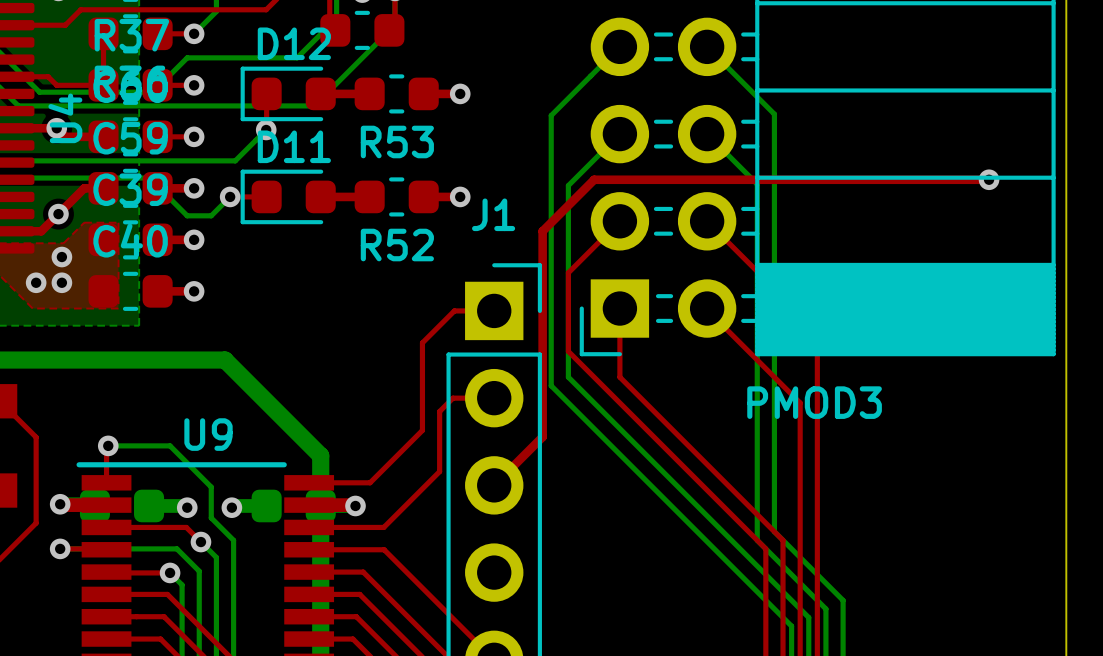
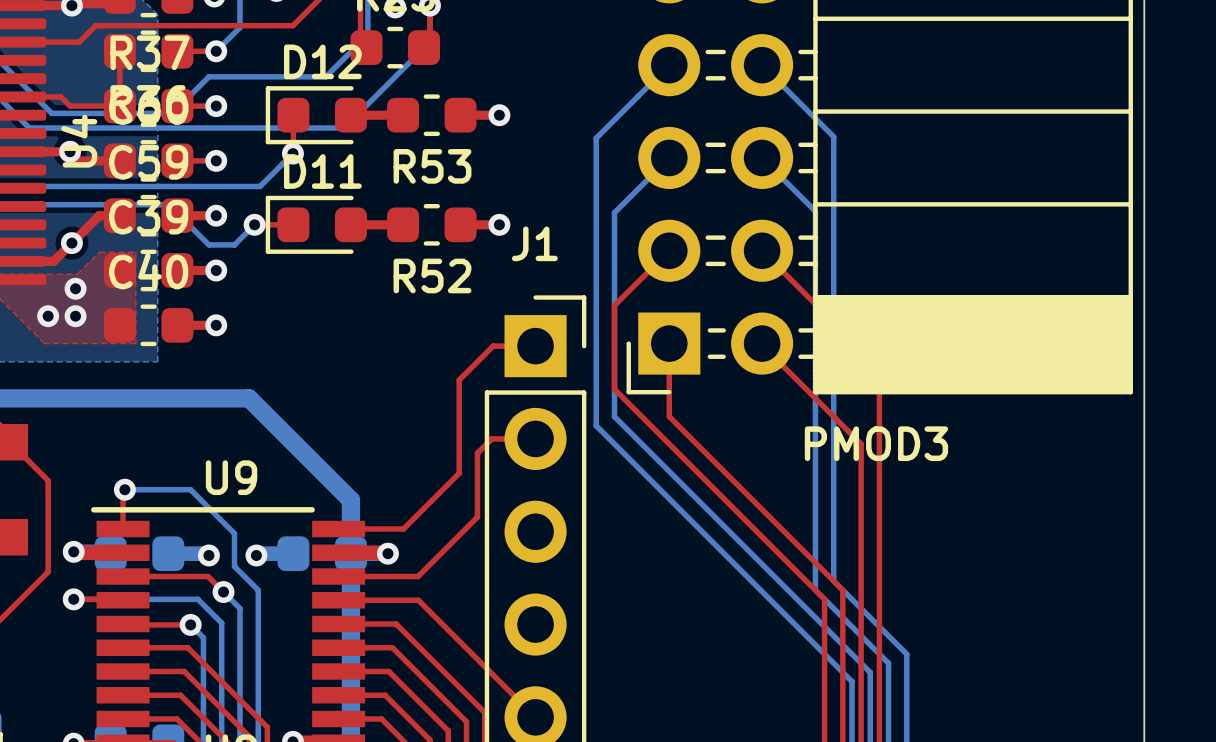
top track: (989, 179) (594, 179) (542, 231) (542, 436) (494, 485) -> none
via: (989, 179) -> none

